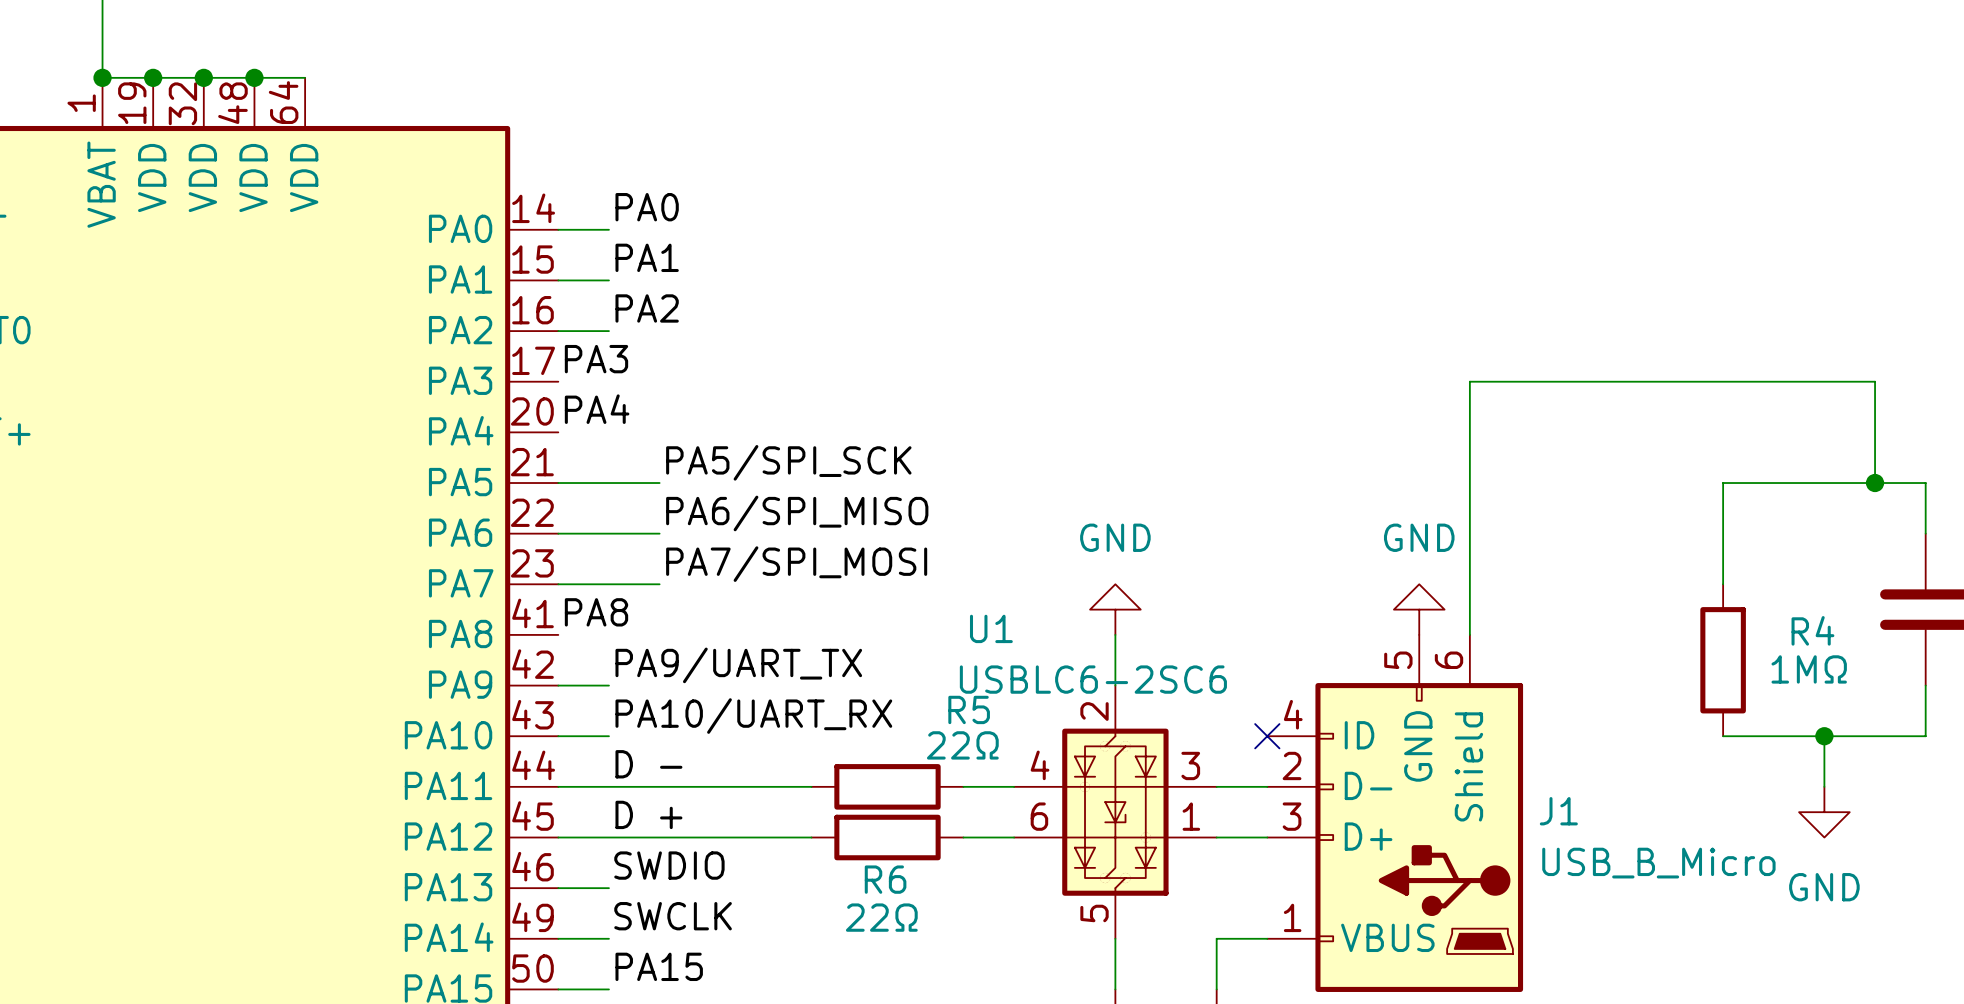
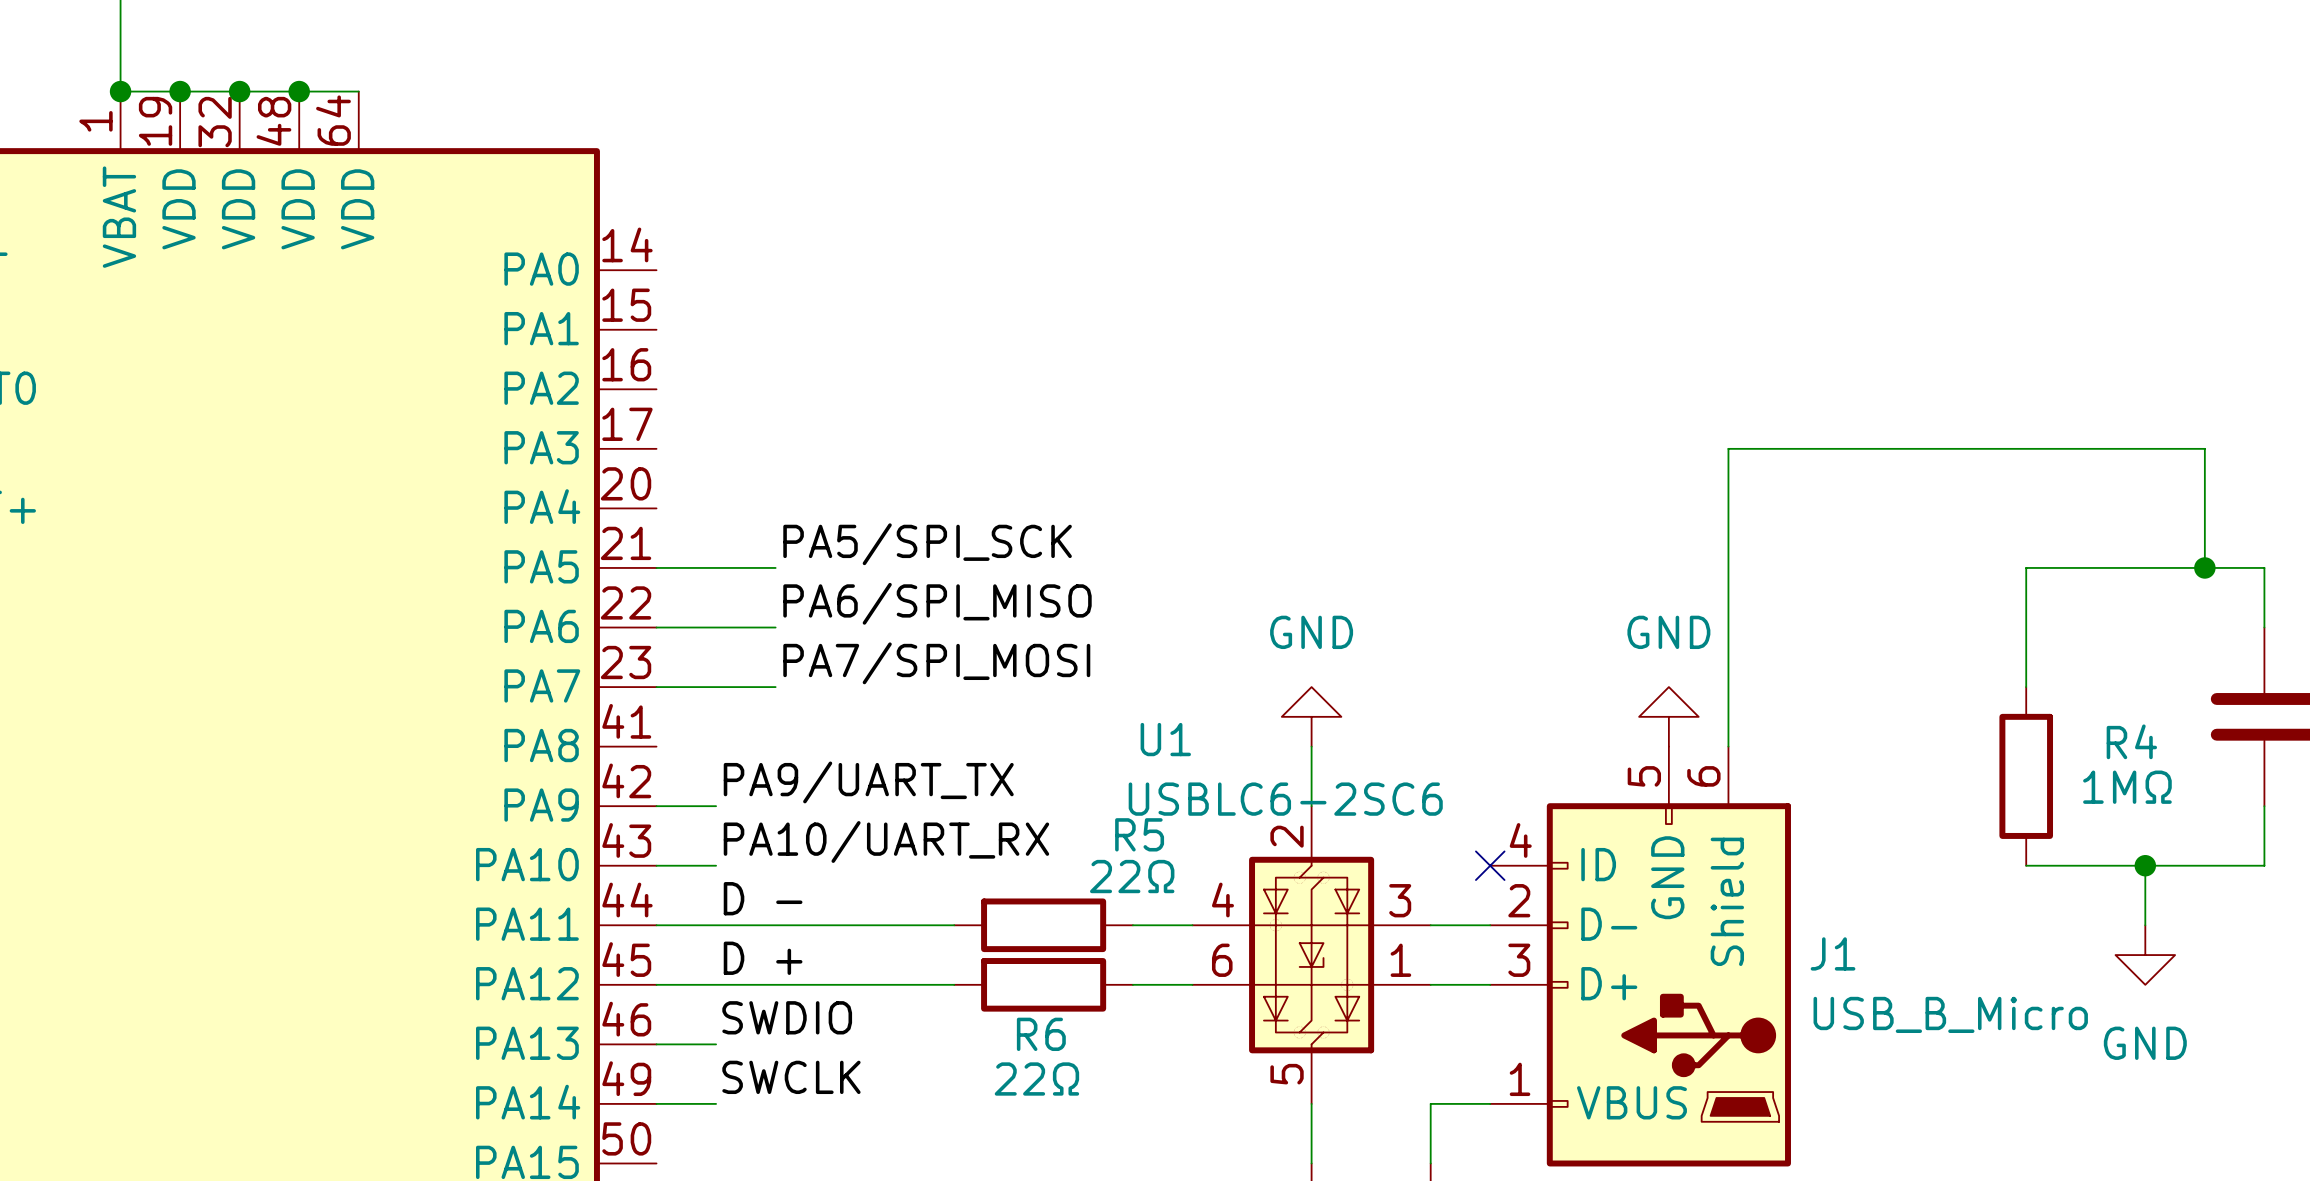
label: PA0 (647, 207) -> none
wire: (558, 229) (608, 229) -> none
label: PA1 (647, 257) -> none
wire: (558, 280) (608, 280) -> none
label: PA2 (647, 308) -> none
wire: (558, 331) (608, 331) -> none
label: PA3 (596, 359) -> none
label: PA4 (597, 409) -> none
label: PA8 (596, 612) -> none
label: PA15 (659, 966) -> none
wire: (558, 989) (608, 989) -> none

